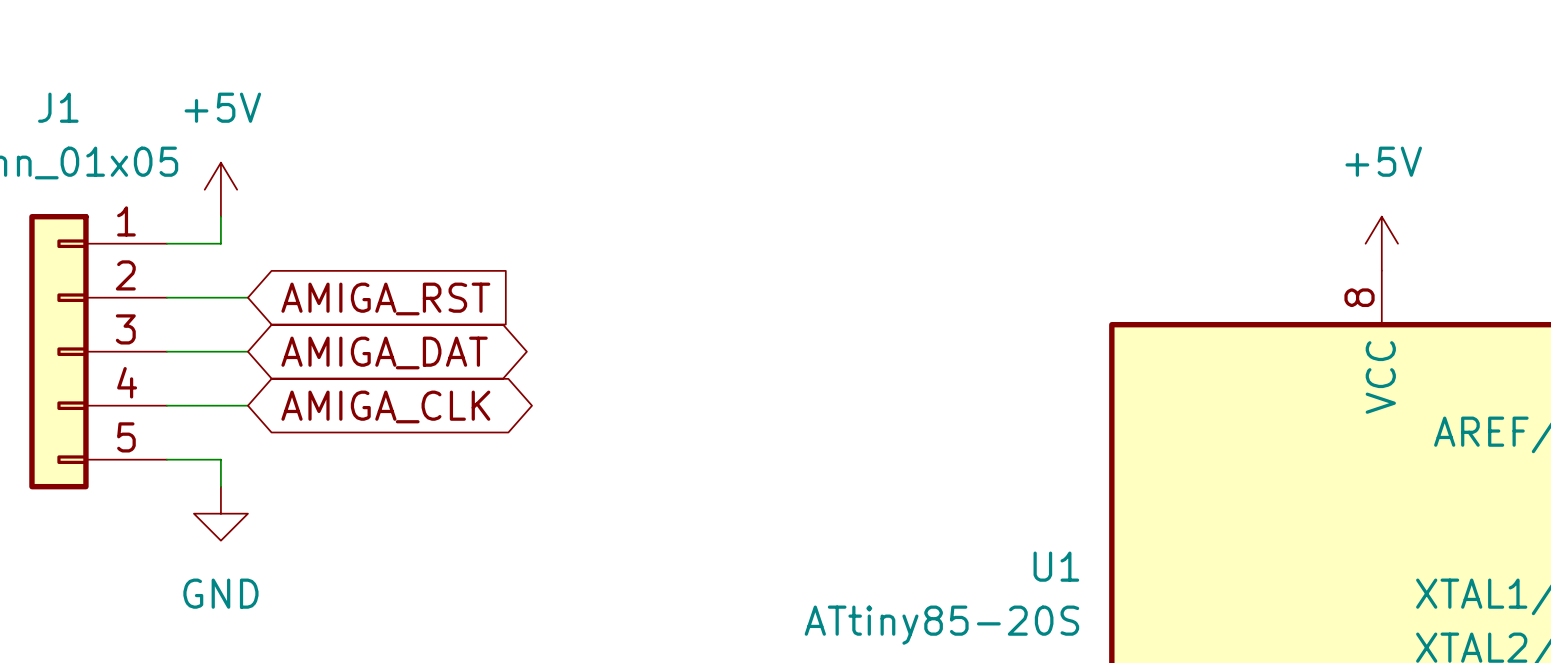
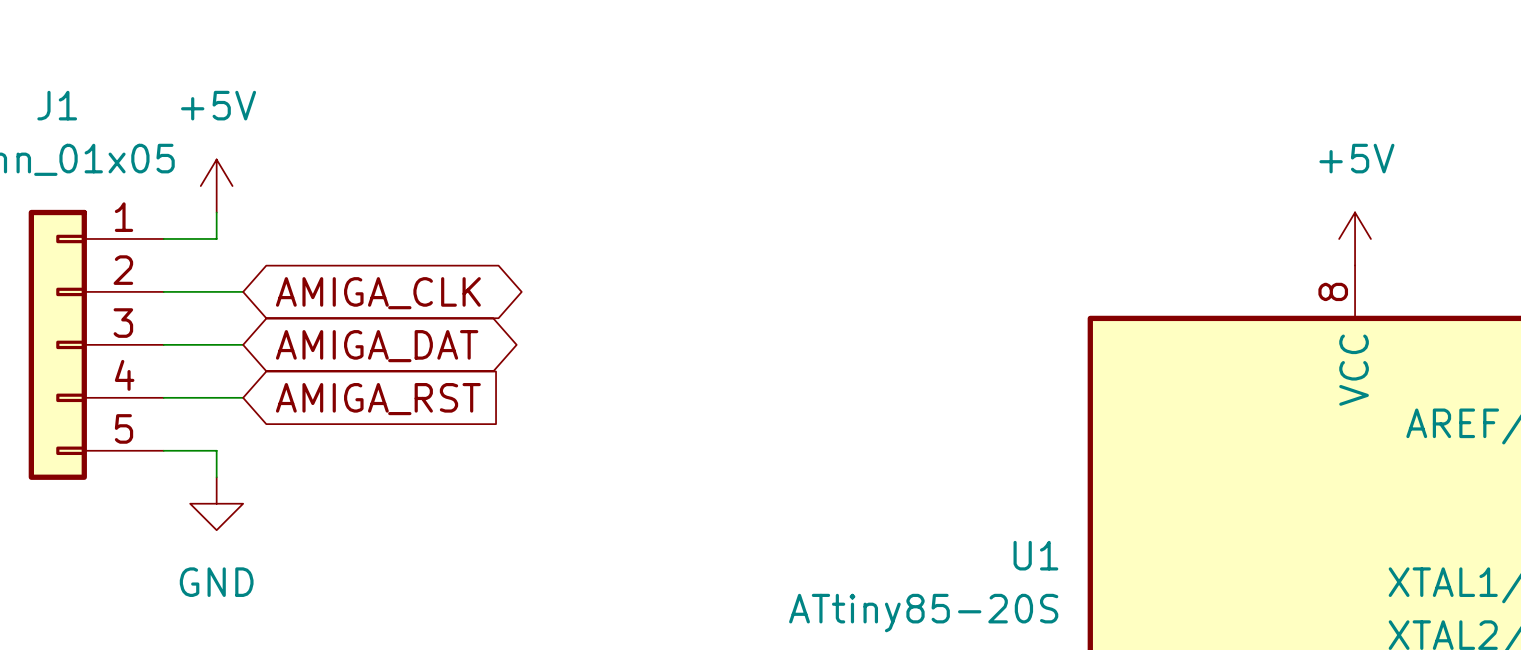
global label shape: input (385, 298) -> bidirectional (378, 293)
global label: AMIGA_RST (385, 298) -> AMIGA_CLK (378, 293)
global label shape: bidirectional (385, 406) -> input (378, 399)
global label: AMIGA_CLK (385, 406) -> AMIGA_RST (378, 399)

